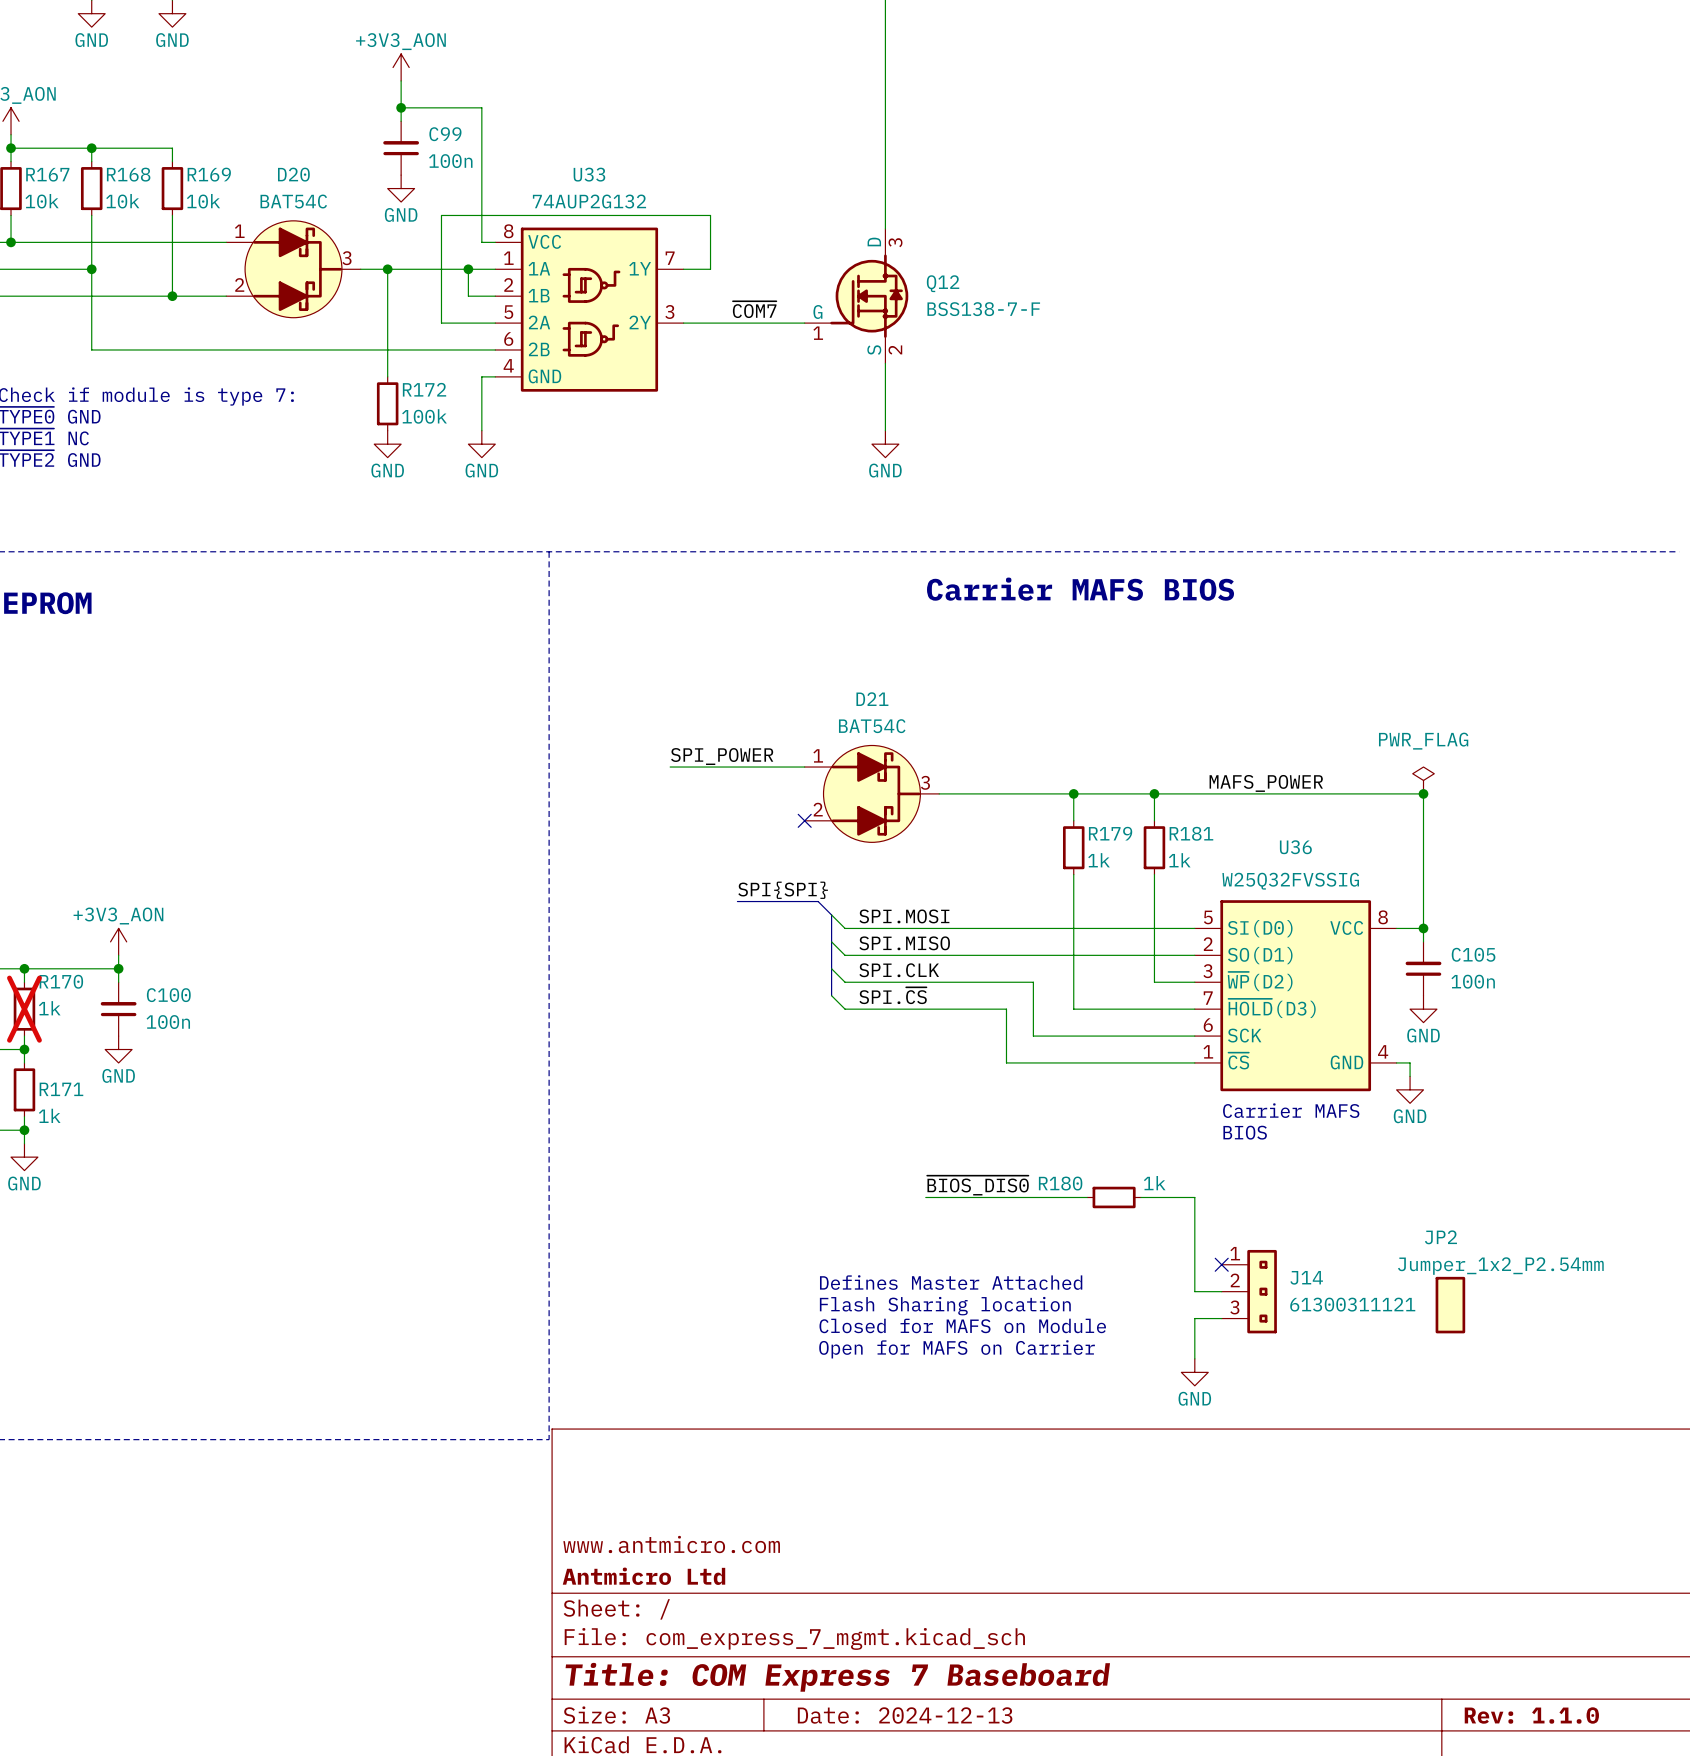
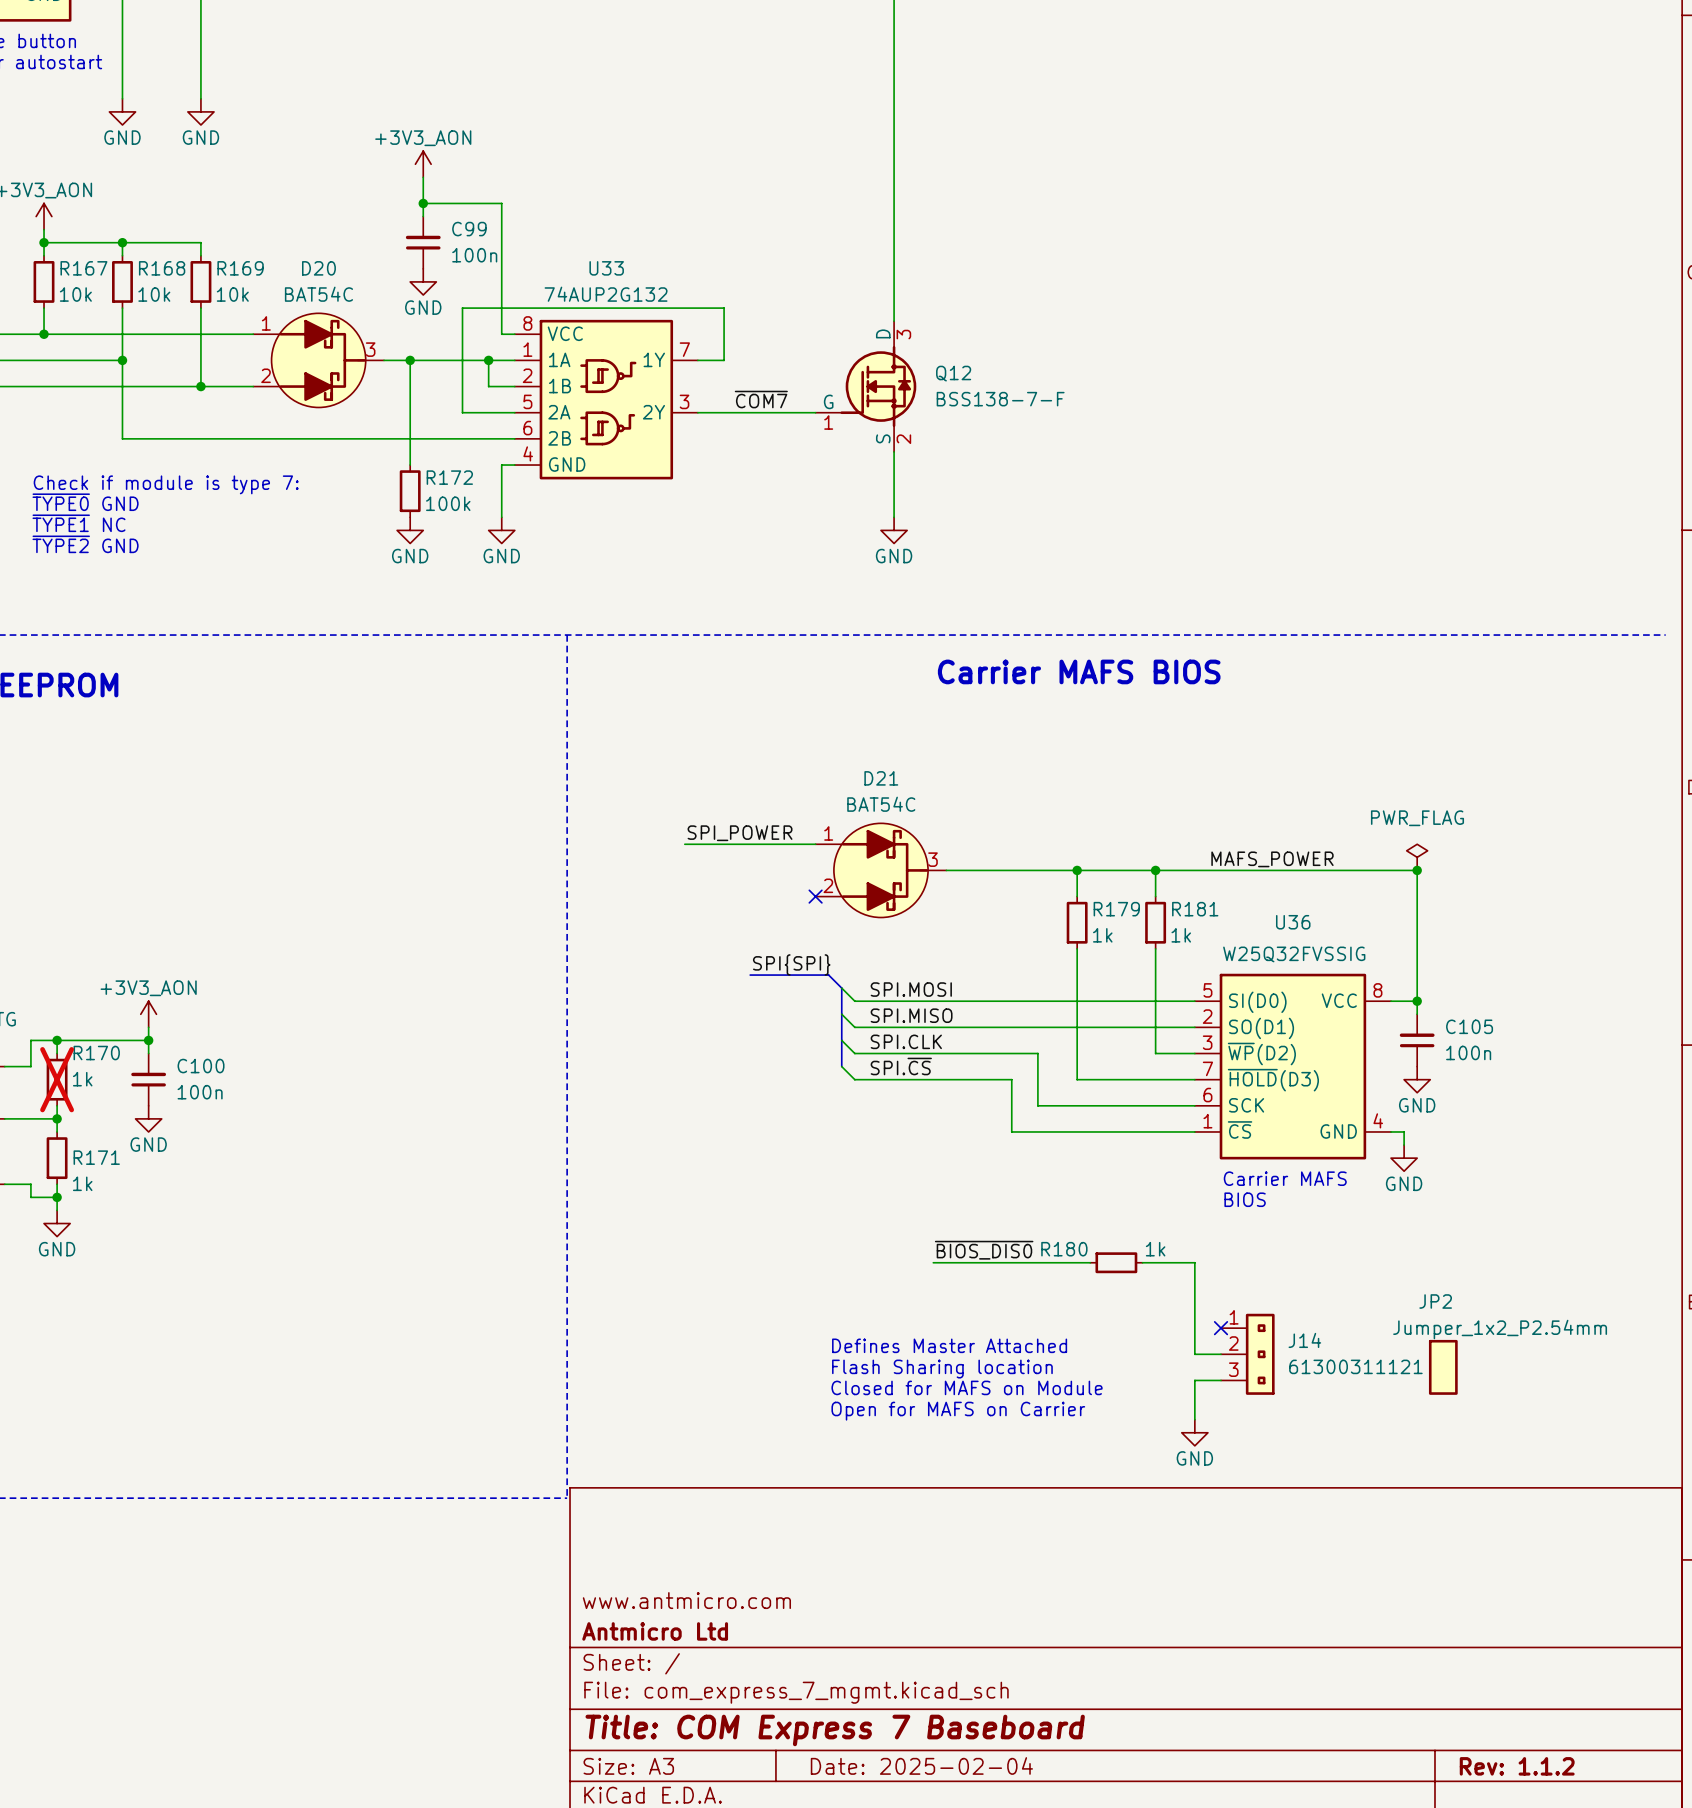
title block: Date: 2024-12-13 (905, 1715) -> Date: 2025-02-04 (921, 1765)
title block: Rev: 1.1.0 (1531, 1715) -> Rev: 1.1.2 (1517, 1766)

